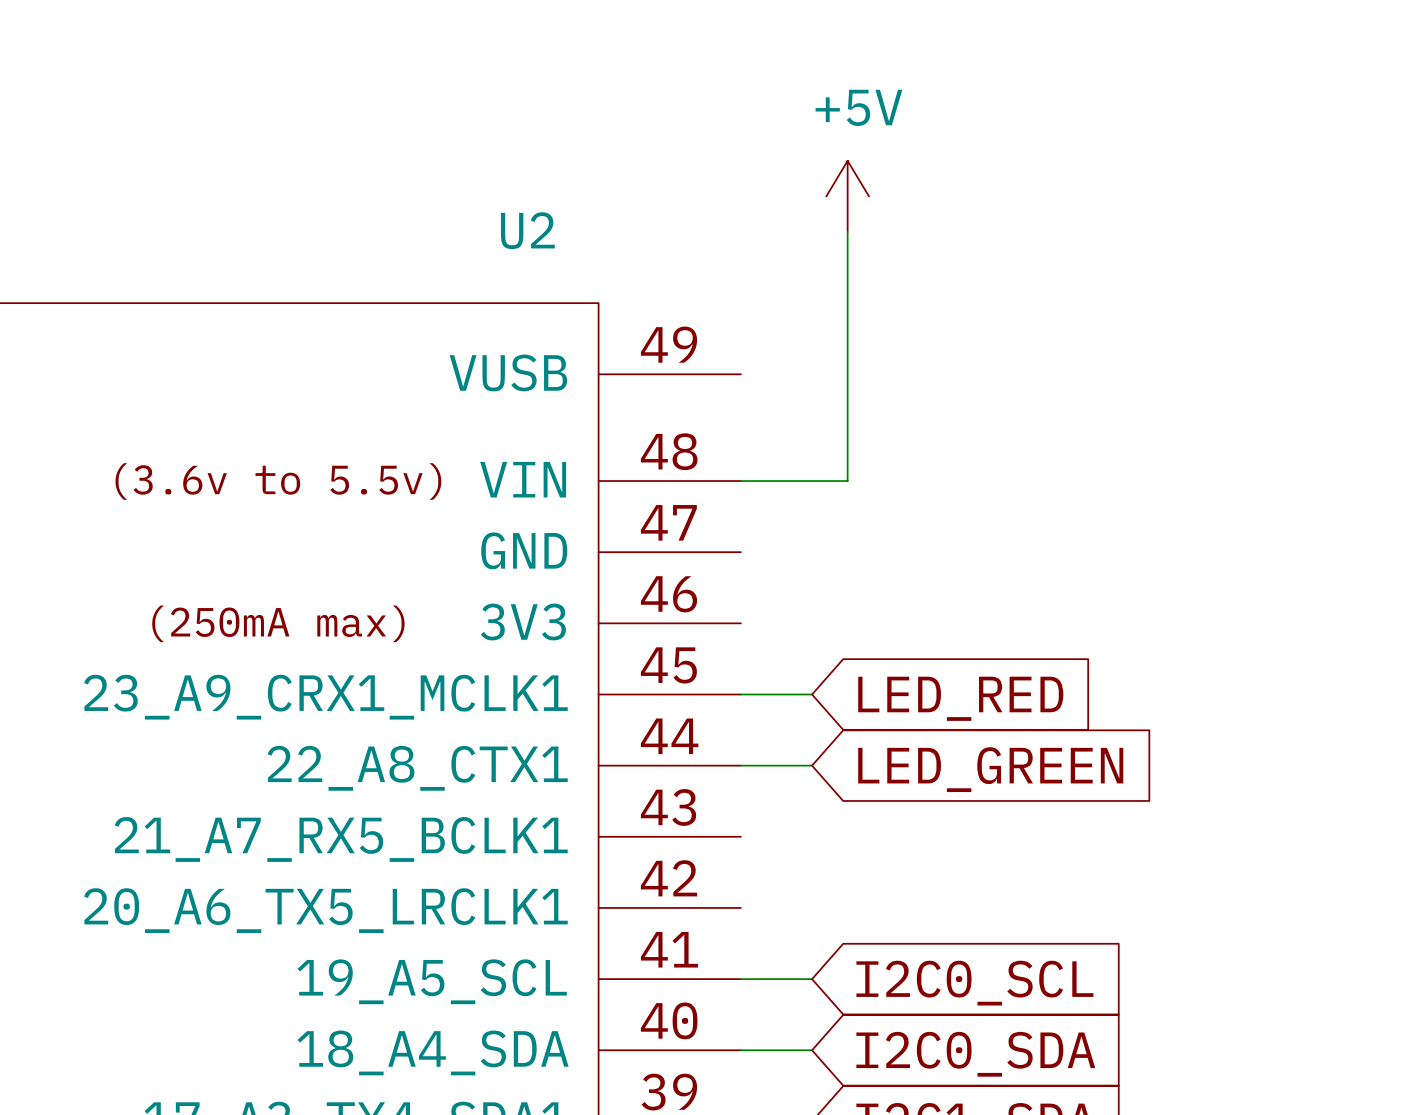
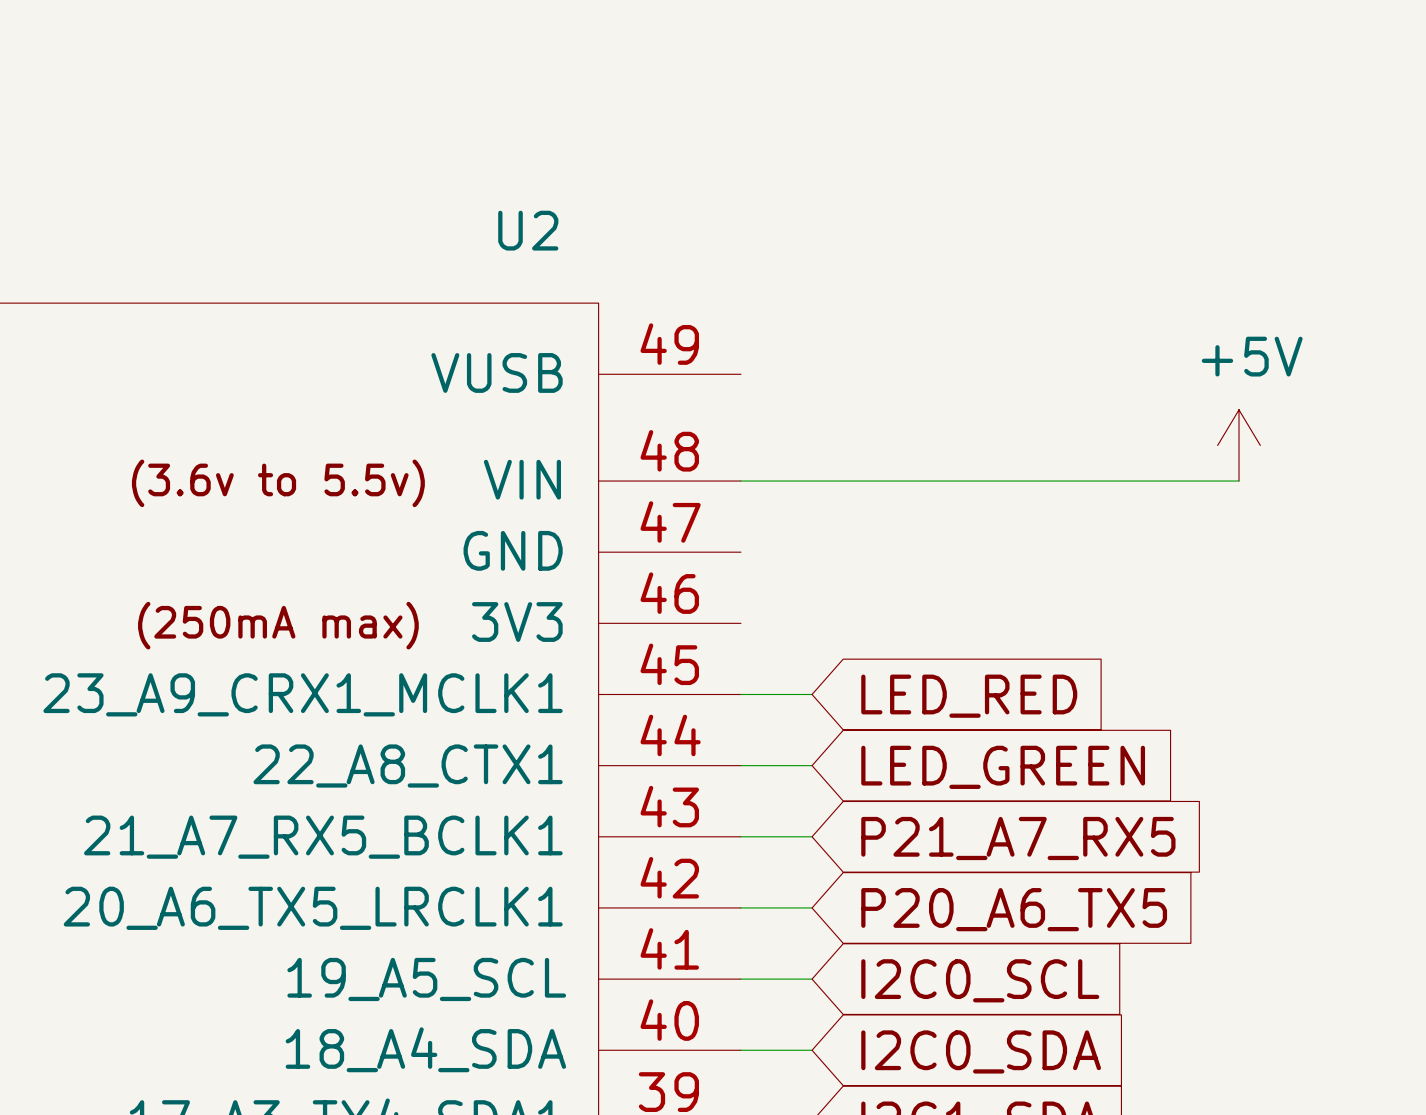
power symbol position: +5V (847, 196) -> +5V (1238, 445)
wire: (847, 231) (847, 481) -> (1238, 481) (847, 481)
wire: none -> (740, 836) (812, 836)
global label: none -> P21_A7_RX5 (1018, 838)
wire: none -> (740, 907) (812, 907)
global label: none -> P20_A6_TX5 (1014, 909)

